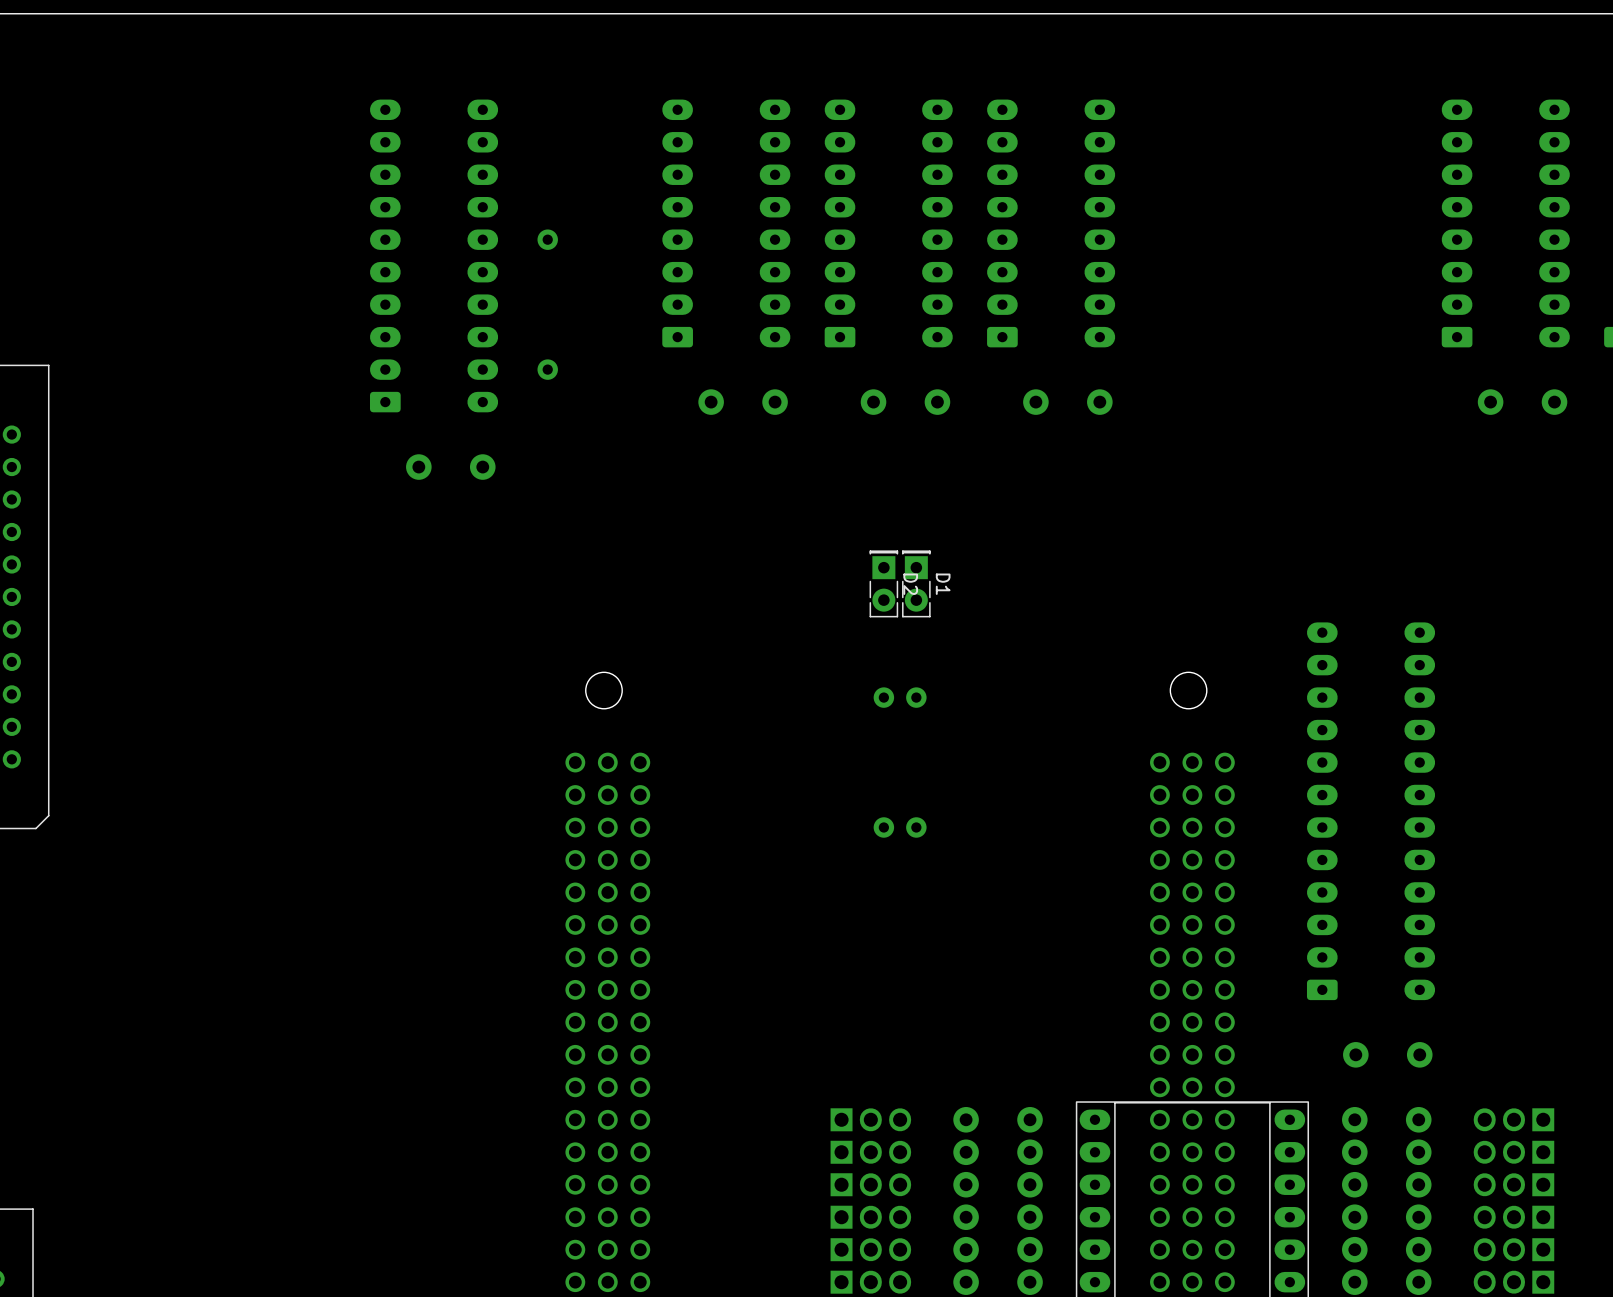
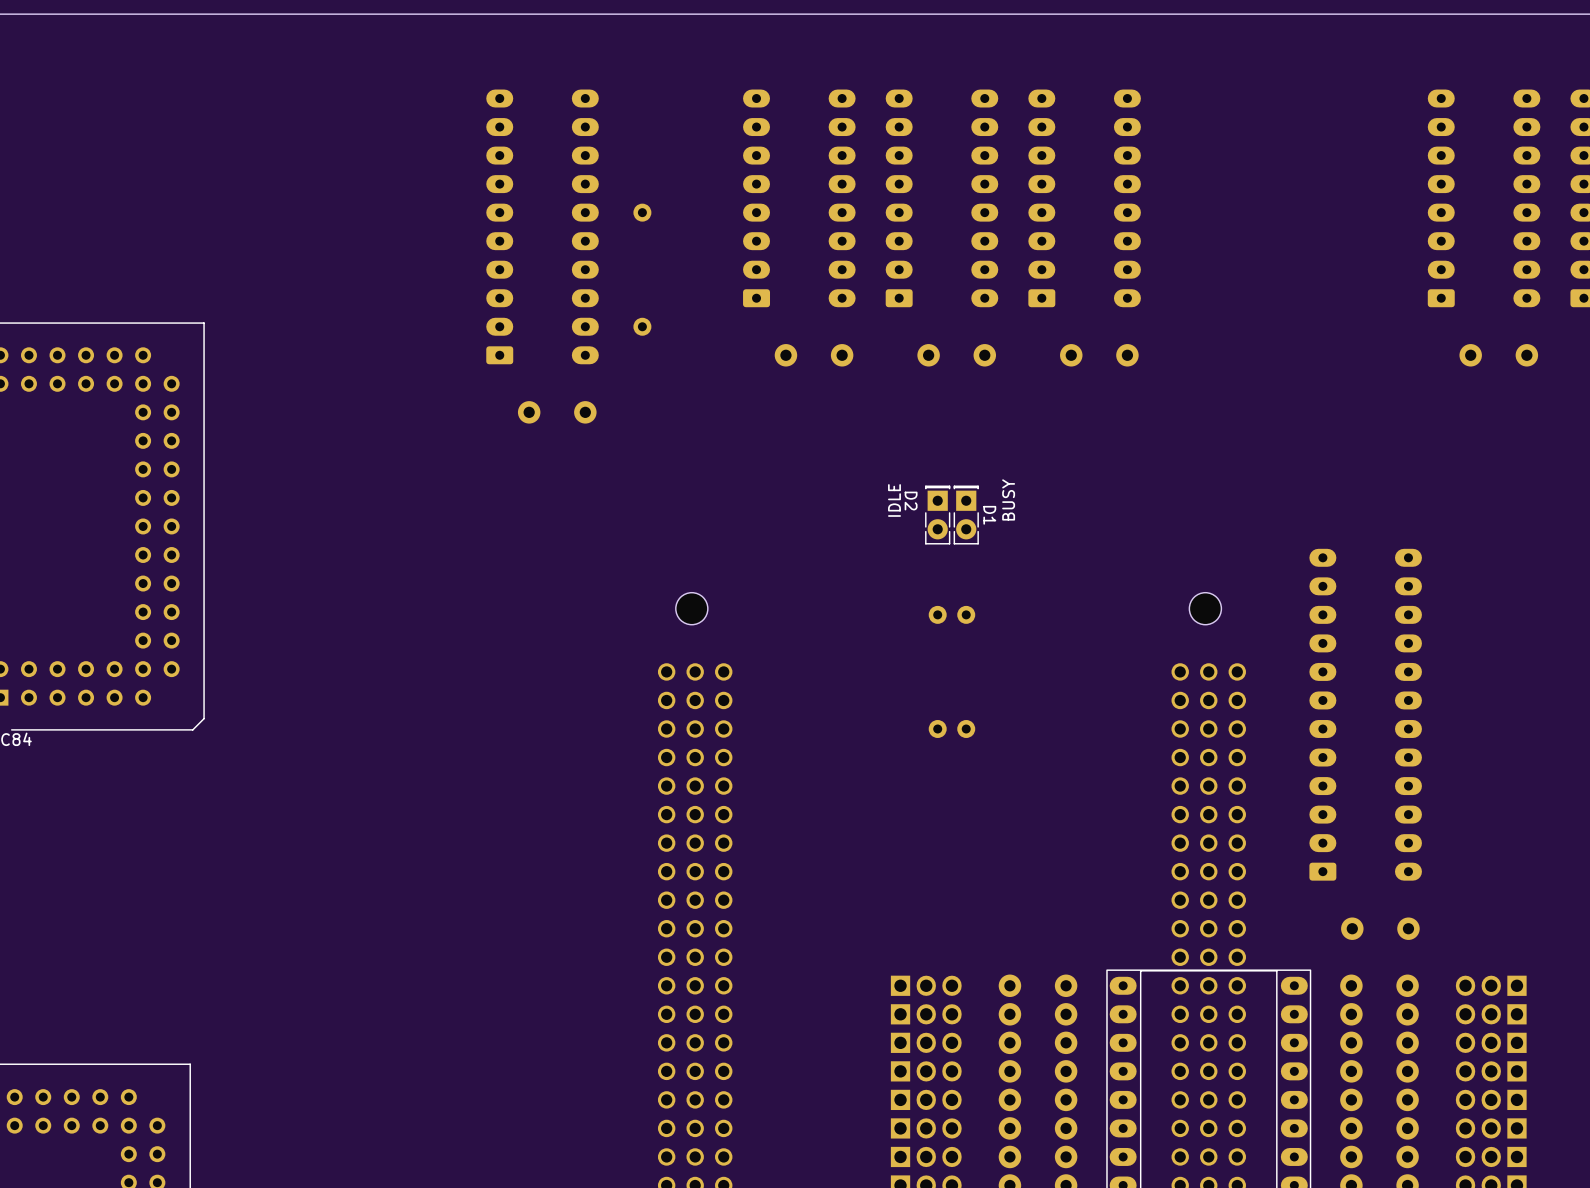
D1 text: none -> BUSY (1008, 499)
D2 text: none -> IDLE (894, 500)
D2 name position: D2 (910, 584) -> D2 (911, 501)

